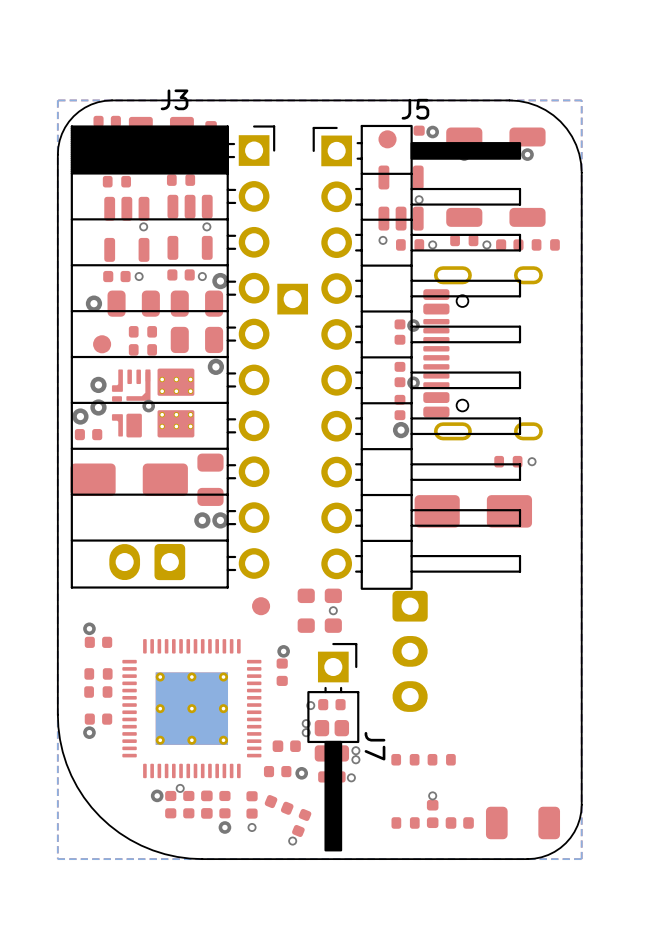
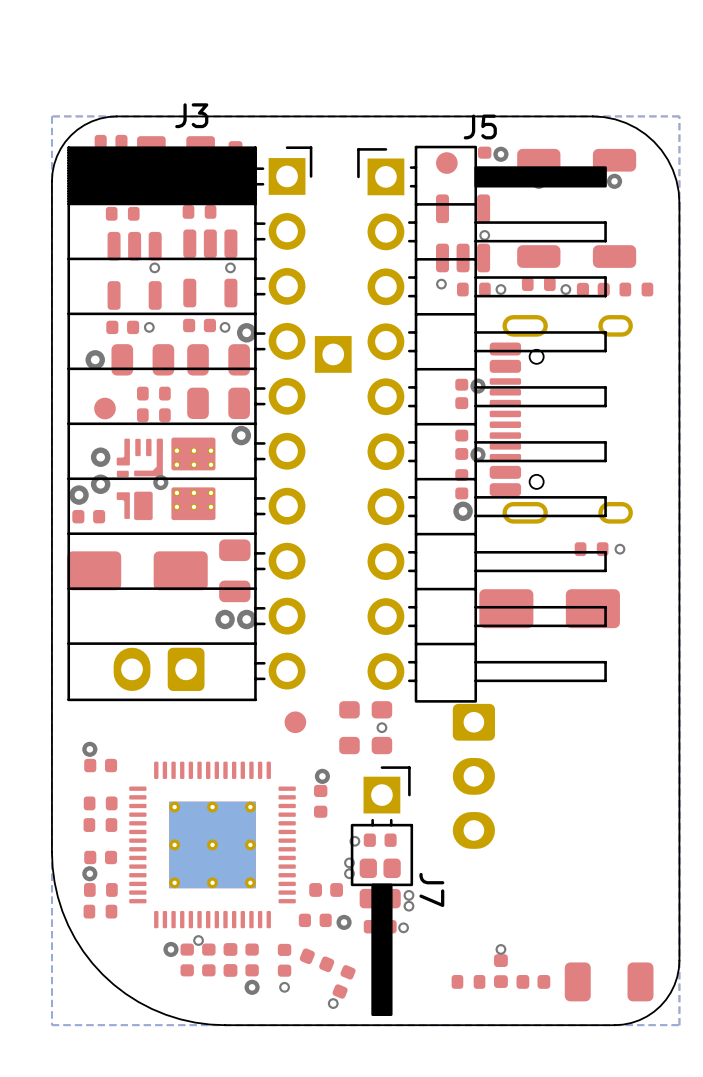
part: none -> (100, 889)
part: (405, 759) -> none
part: (441, 759) -> none
part: none -> (100, 911)

